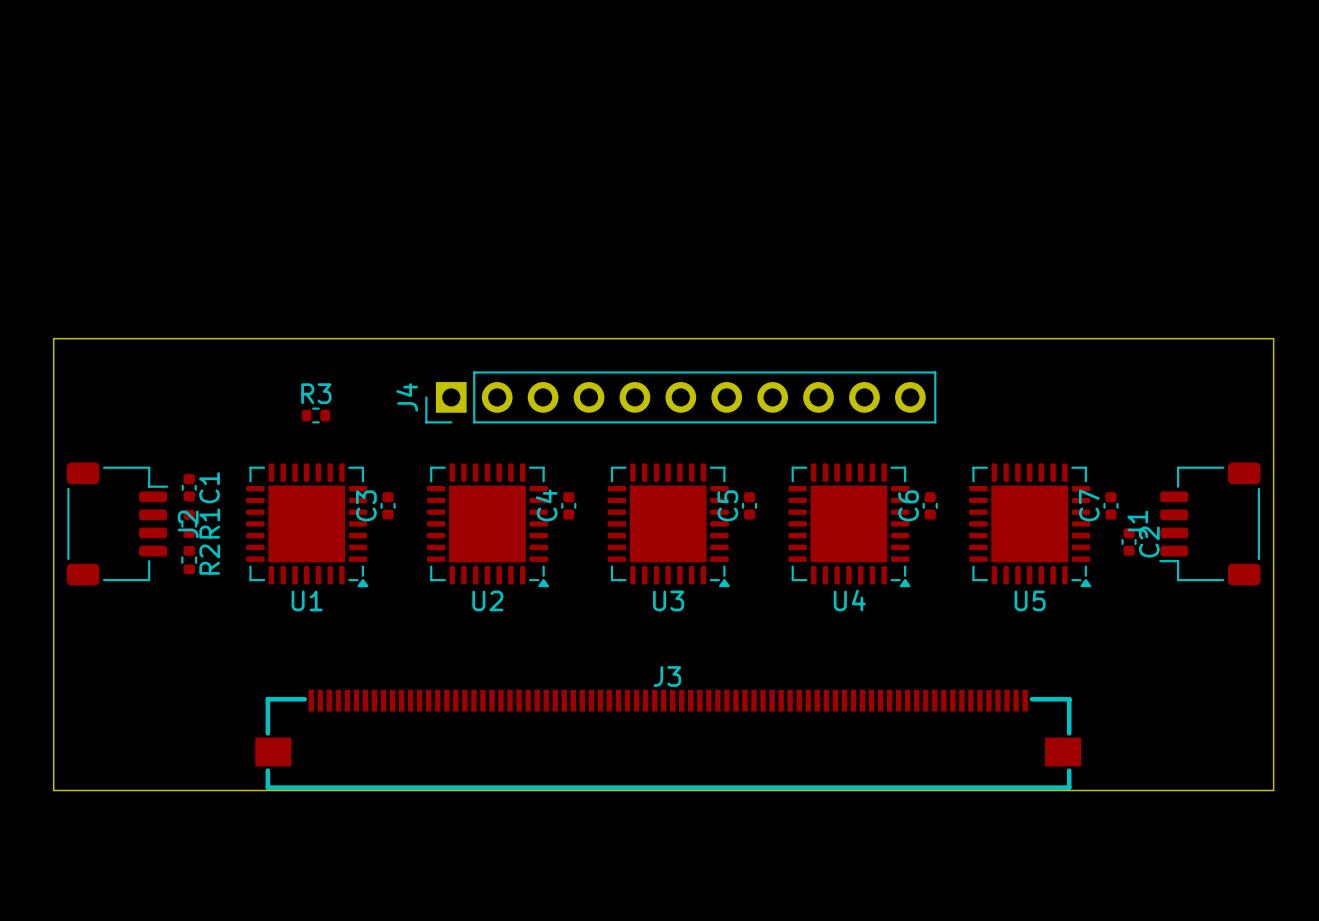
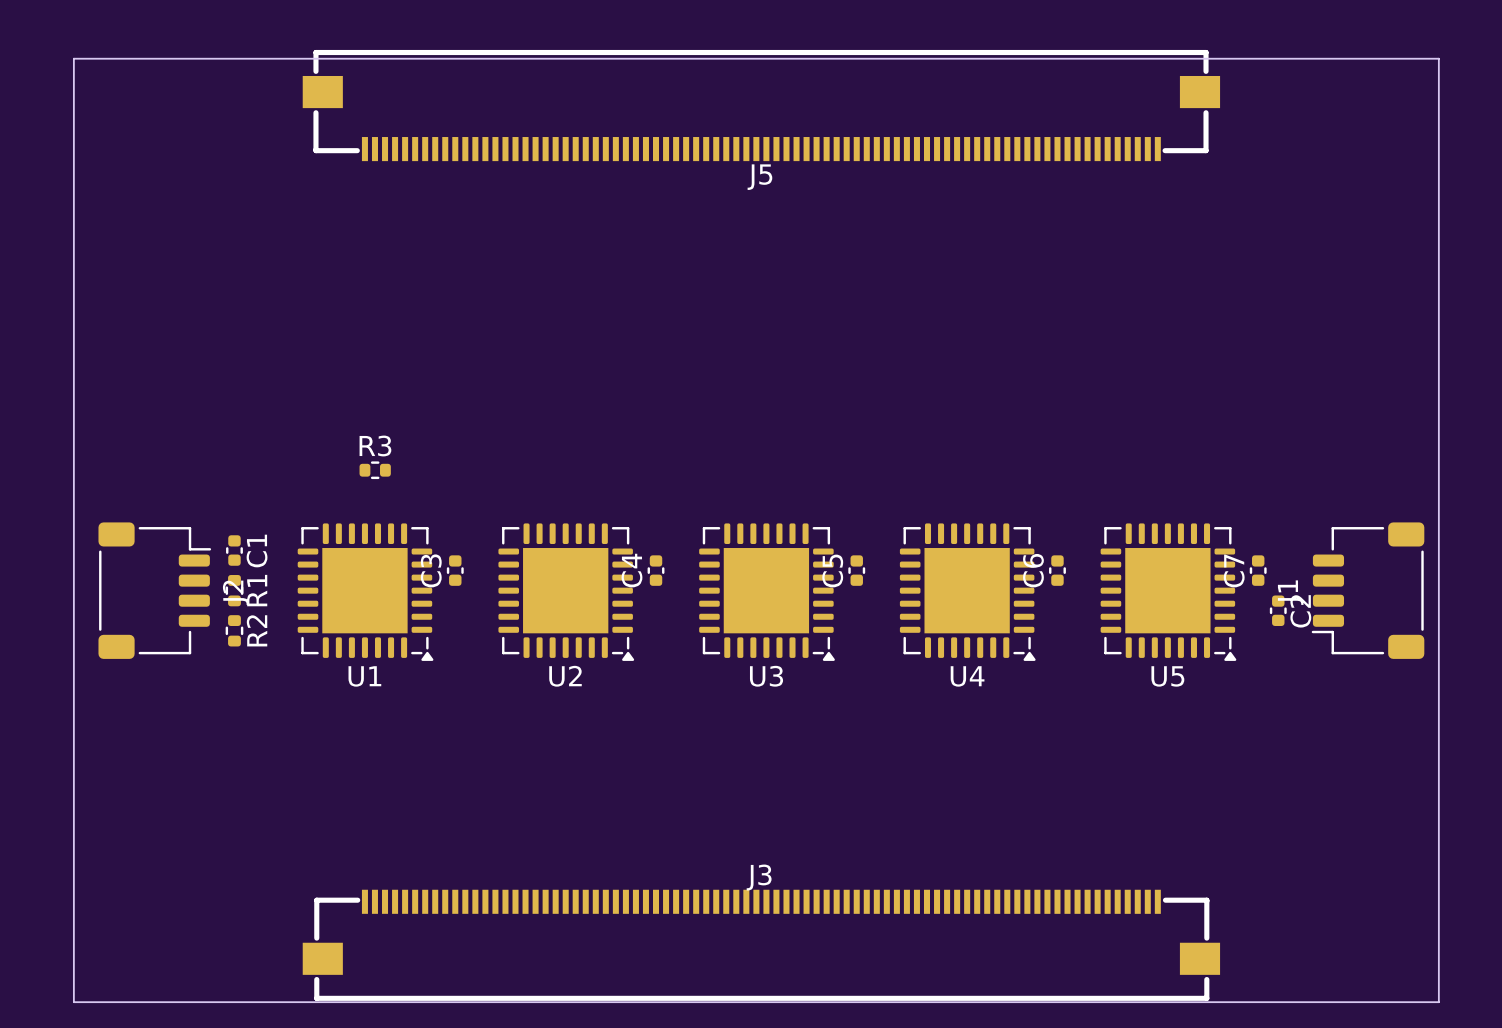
J5: none -> (761, 105)
board edge: (1273, 338) (53, 338) (53, 790) (1273, 790) -> (1438, 384) (1438, 58) (73, 58) (73, 1002) (1438, 1002) (1438, 886)
J4: (680, 397) -> none
J3 position: (668, 739) -> (761, 945)

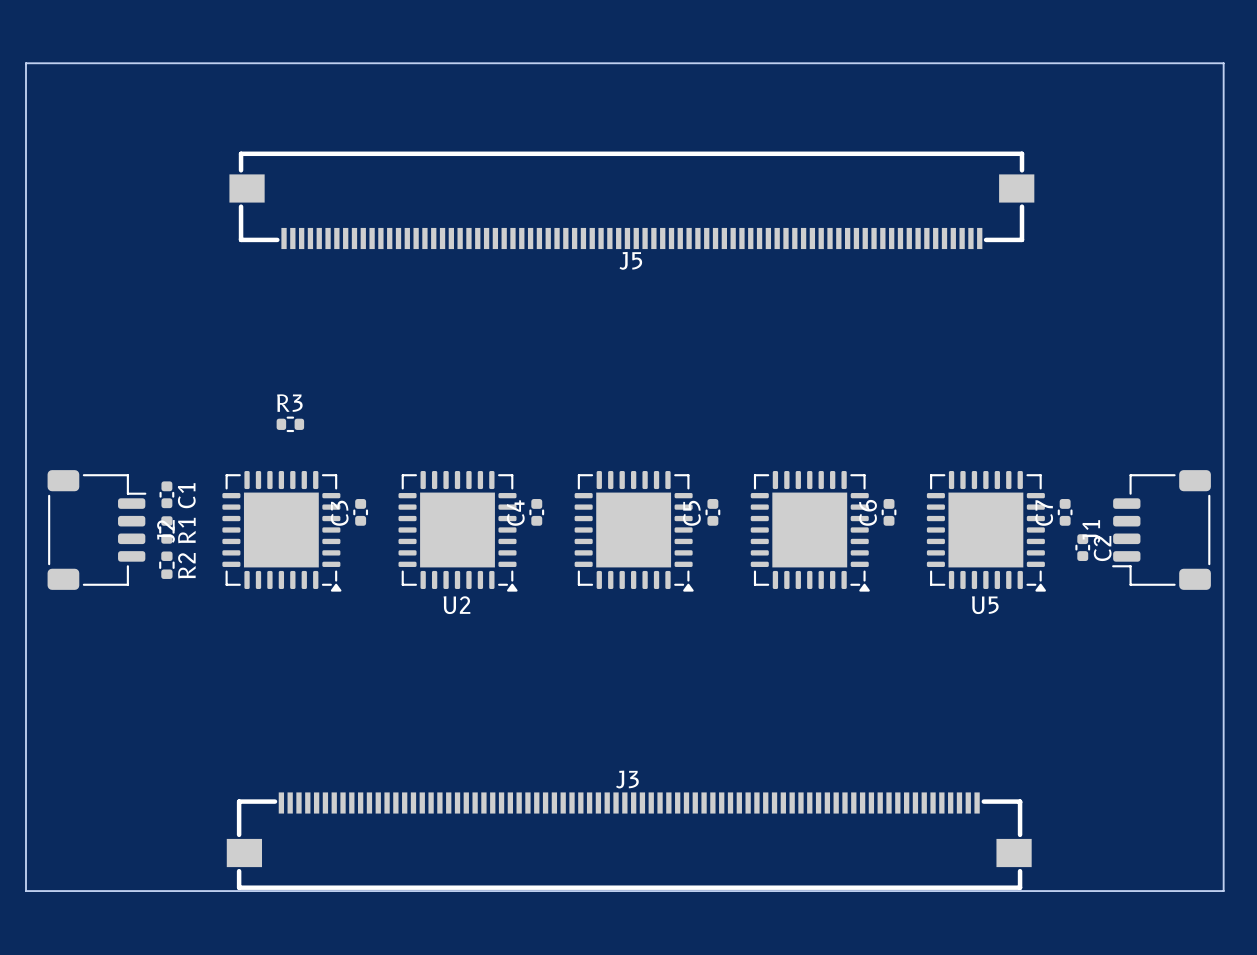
J5 position: (761, 105) -> (631, 200)
U1 name: U1 (364, 676) -> none
U3 name: U3 (766, 676) -> none
U4 name: U4 (967, 676) -> none

